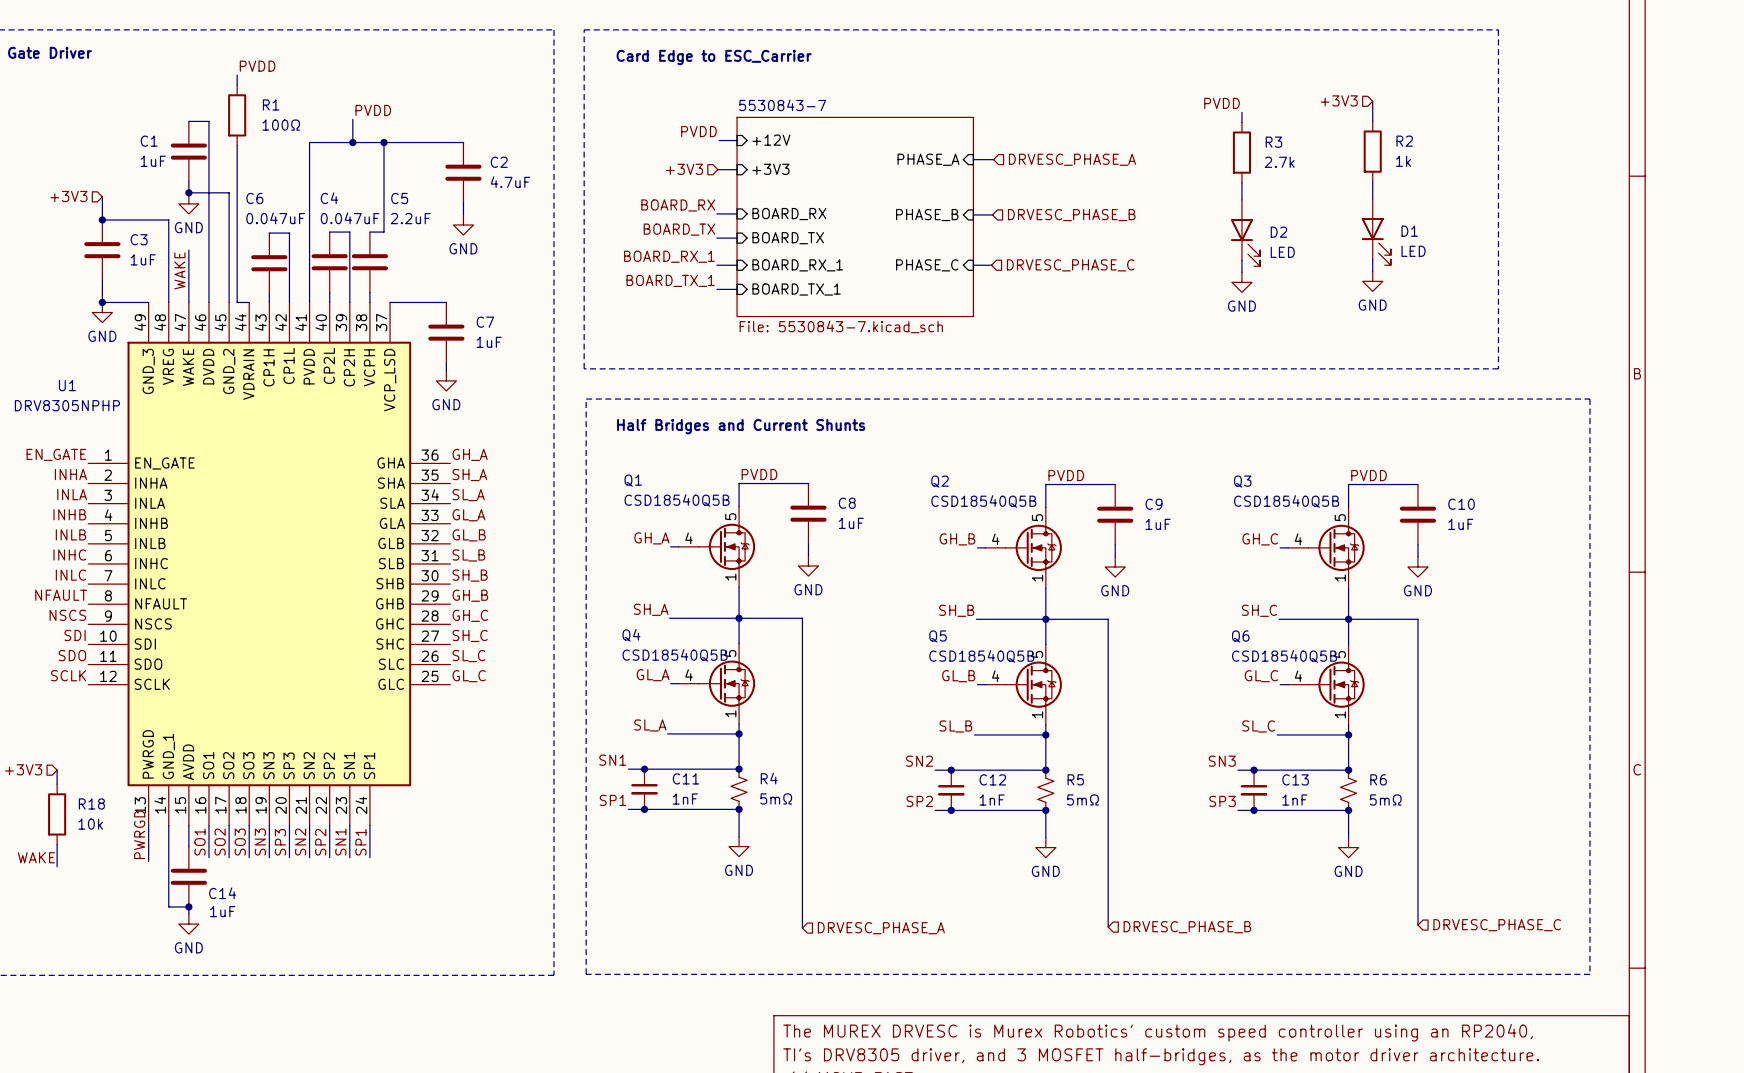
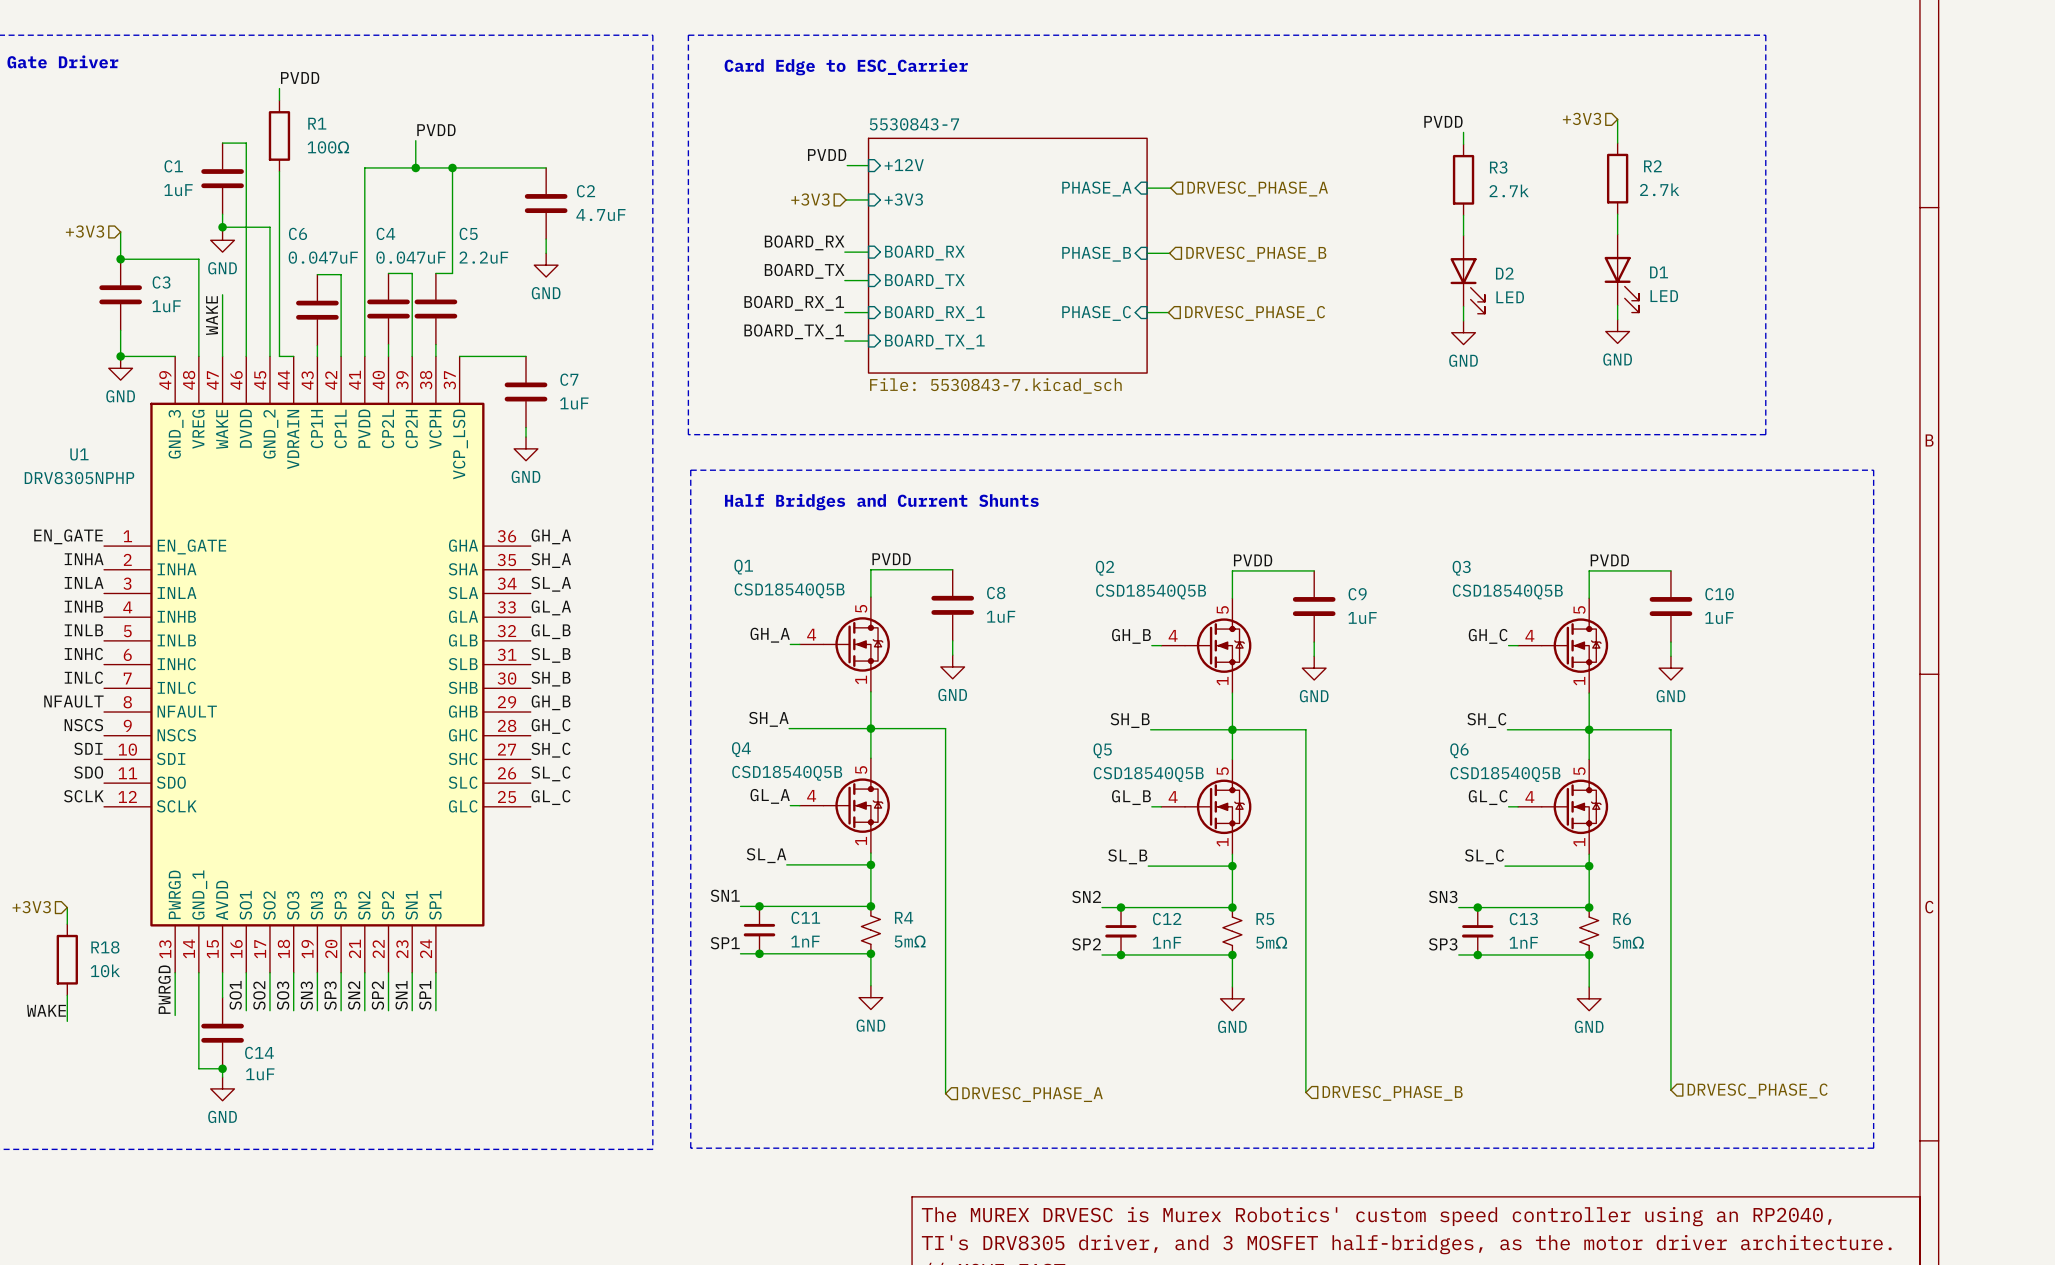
R2 value: 1k (1403, 161) -> 2.7k (1659, 189)

